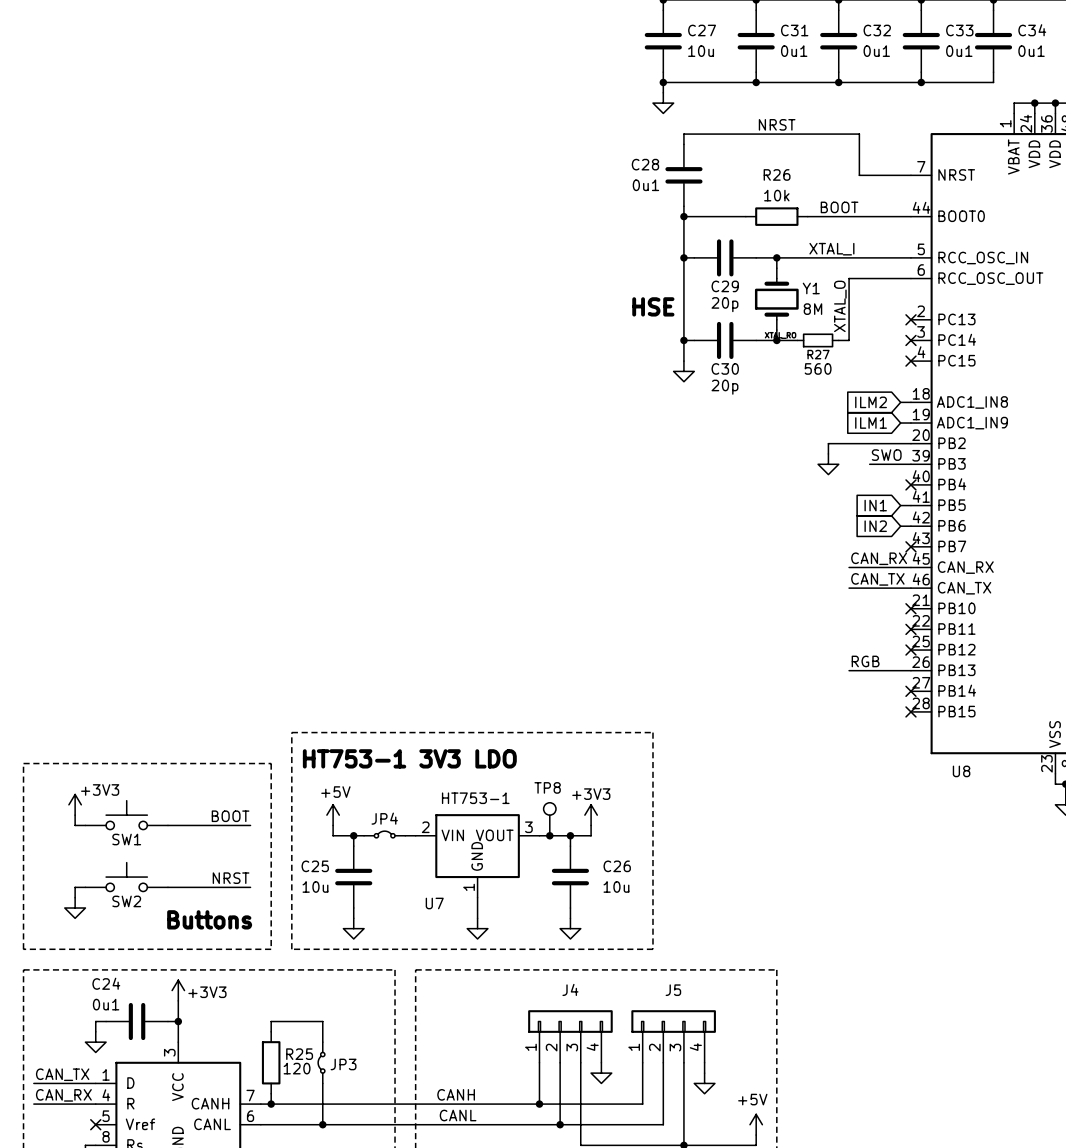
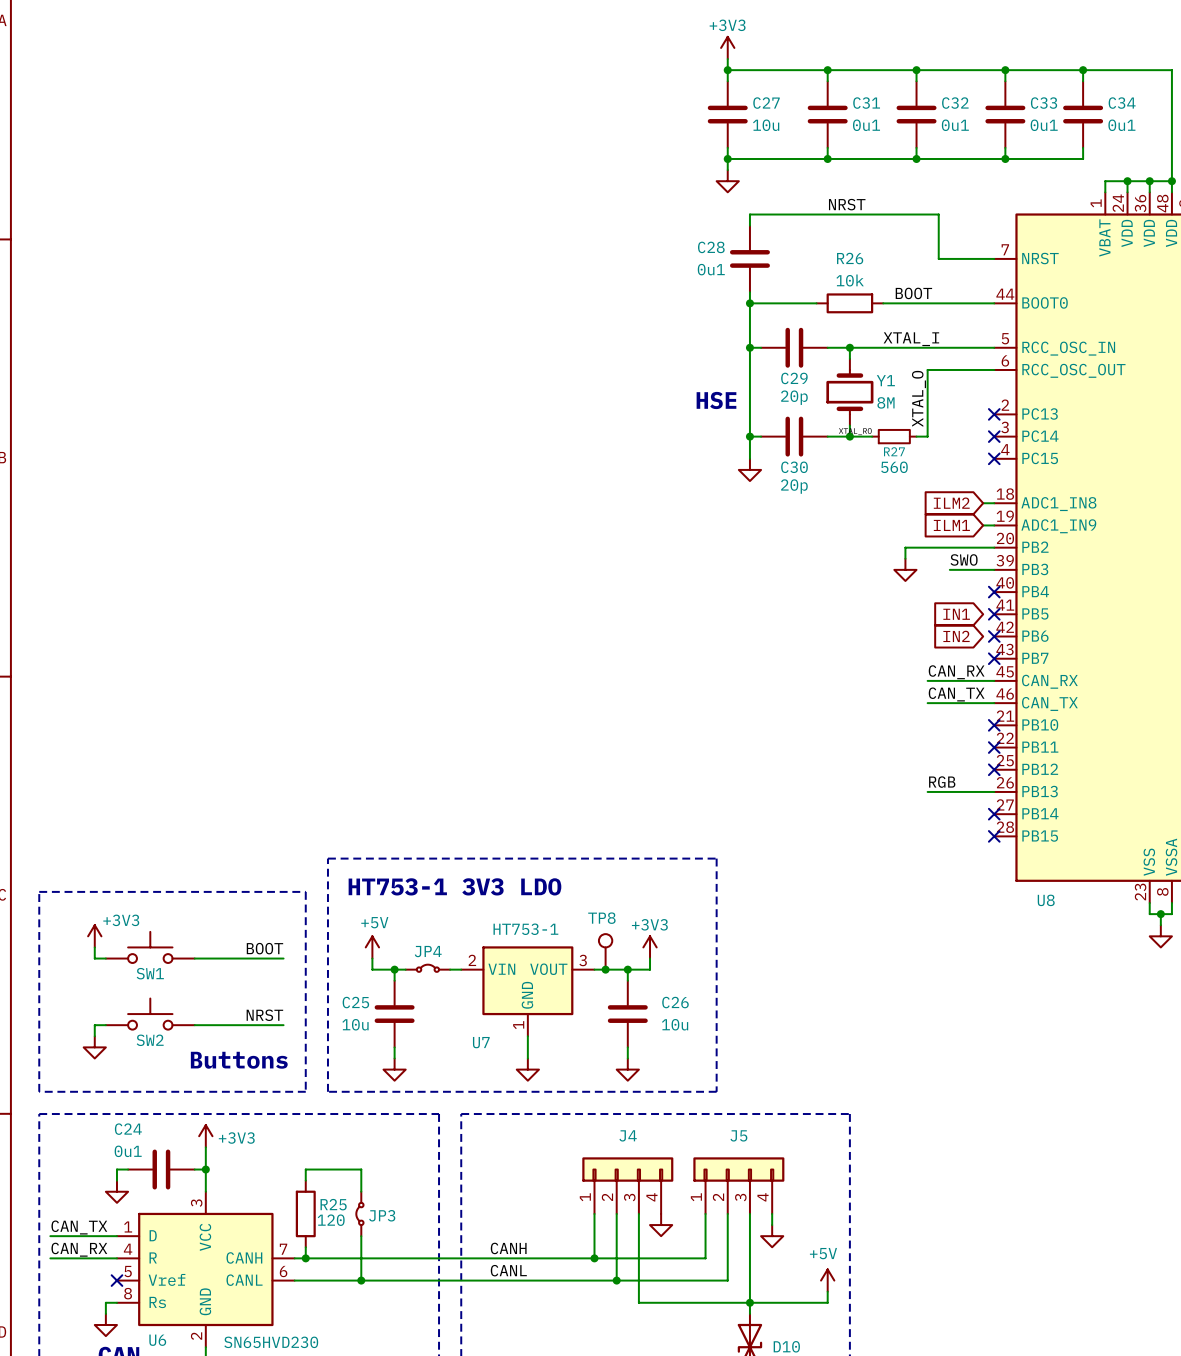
wire: (900, 505) (910, 505) -> none
no-connect mark: none -> (994, 614)
wire: (900, 526) (910, 526) -> none
no-connect mark: none -> (994, 636)

